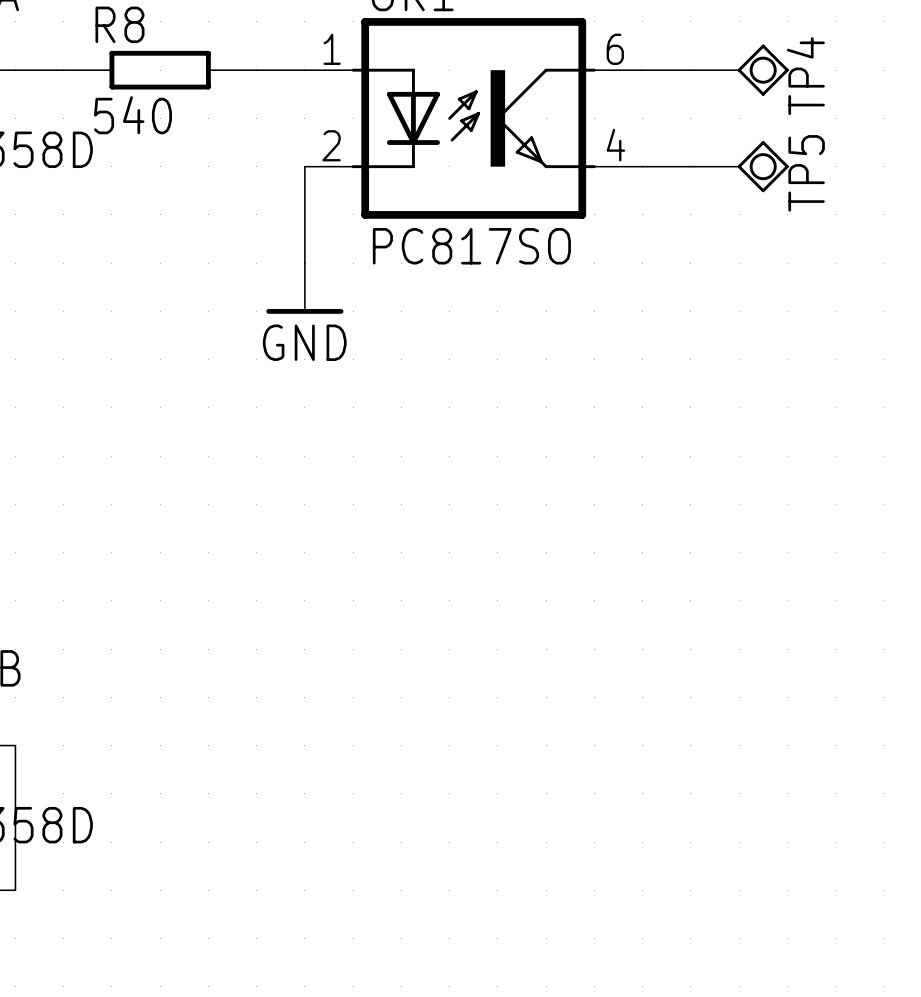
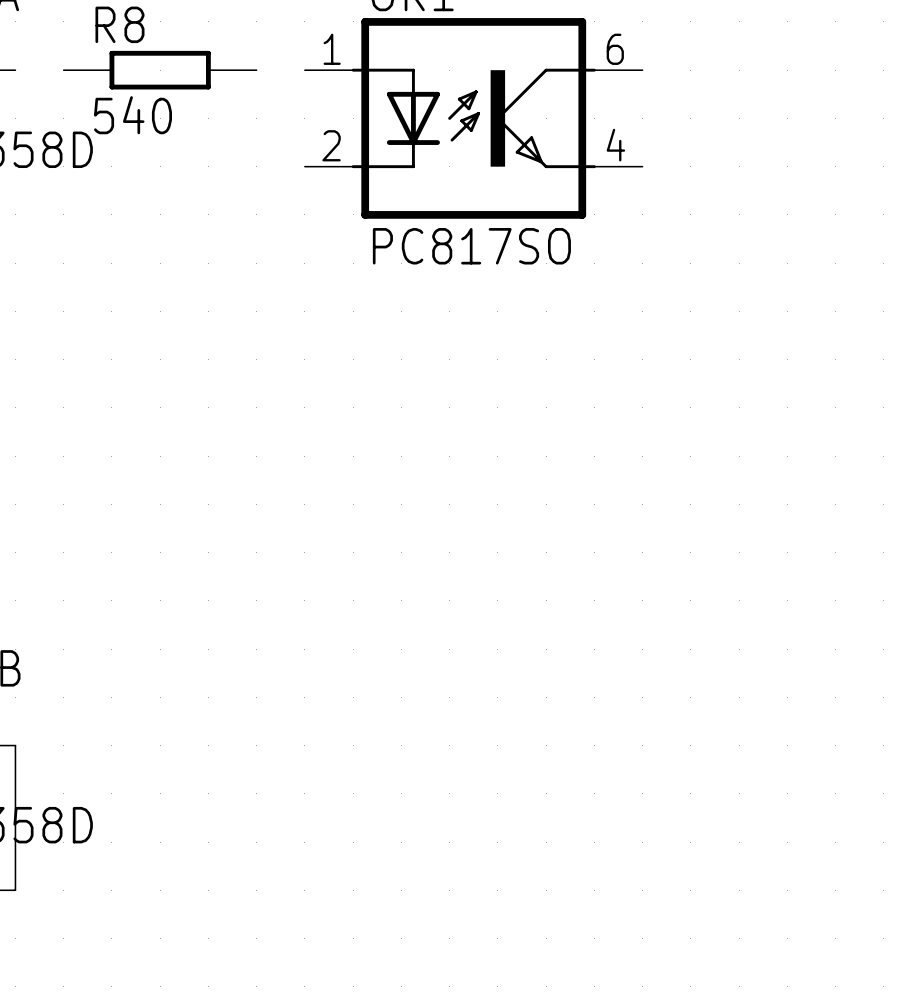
wire: (15, 70) (63, 70) -> none
wire: (256, 70) (304, 70) -> none
wire: (642, 70) (690, 70) -> none
TP4: (739, 70) -> none
wire: (304, 166) (304, 263) -> none
wire: (642, 166) (690, 166) -> none
TP5: (739, 166) -> none
power symbol: GND (304, 288) -> none

